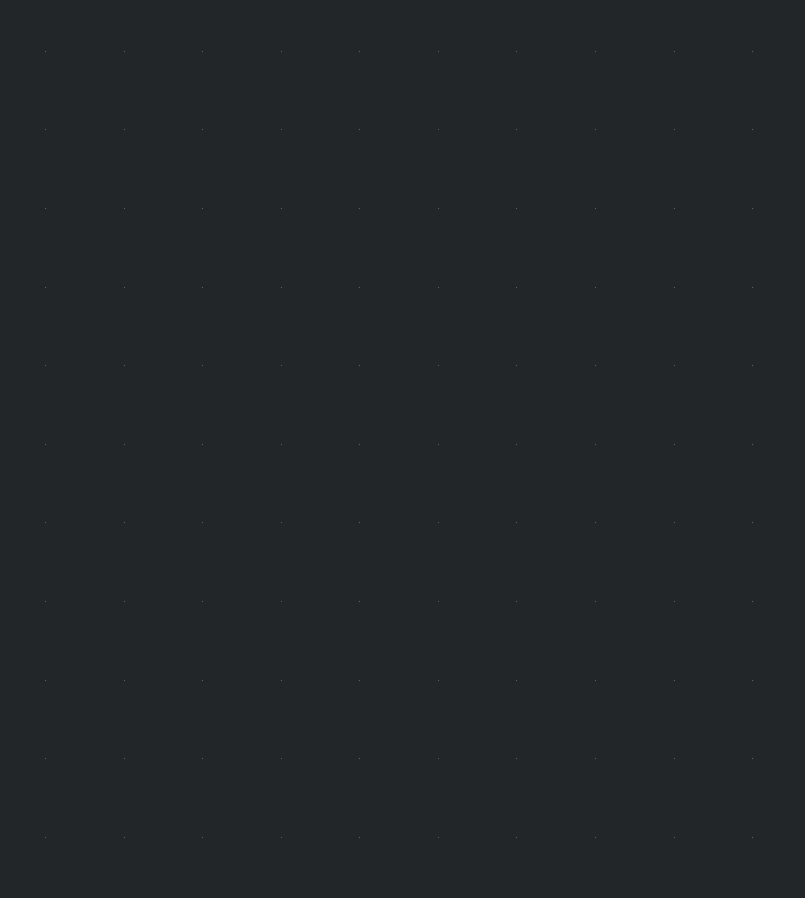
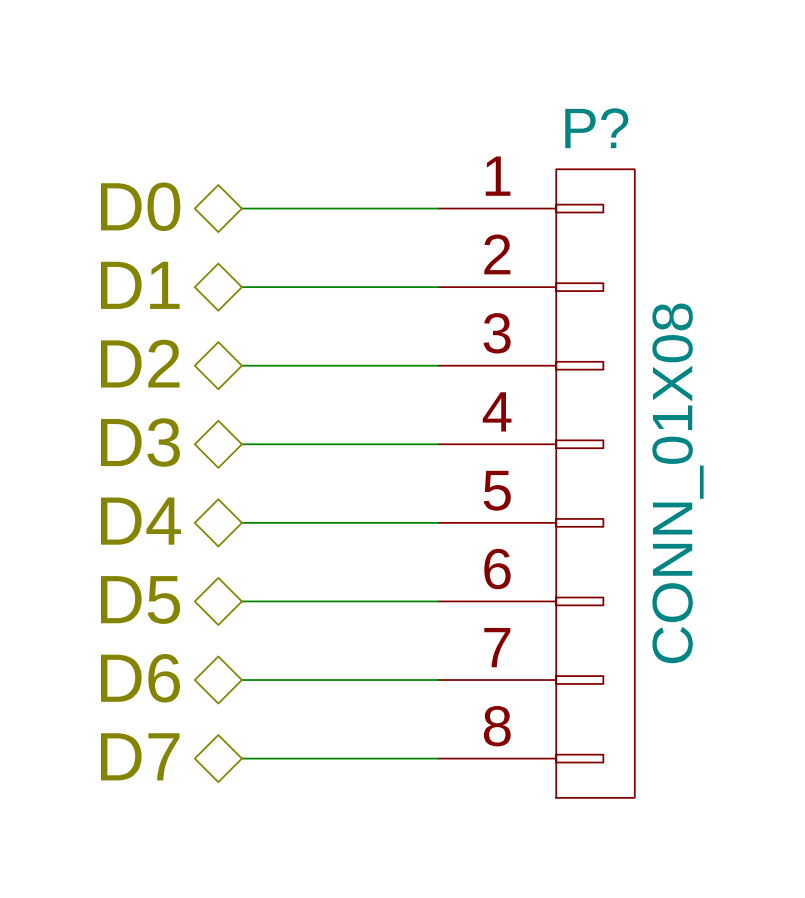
hierarchical label: none -> D0 (140, 206)
wire: none -> (241, 208) (438, 208)
hierarchical label: none -> D1 (140, 285)
wire: none -> (241, 287) (438, 287)
hierarchical label: none -> D2 (140, 363)
wire: none -> (241, 365) (438, 365)
hierarchical label: none -> D3 (140, 442)
wire: none -> (241, 444) (438, 444)
P?: none -> CONN_01X08 (536, 483)
hierarchical label: none -> D4 (140, 521)
wire: none -> (241, 522) (438, 522)
hierarchical label: none -> D5 (140, 600)
wire: none -> (241, 601) (438, 601)
hierarchical label: none -> D6 (140, 678)
wire: none -> (241, 680) (438, 680)
hierarchical label: none -> D7 (140, 756)
wire: none -> (241, 758) (438, 758)

